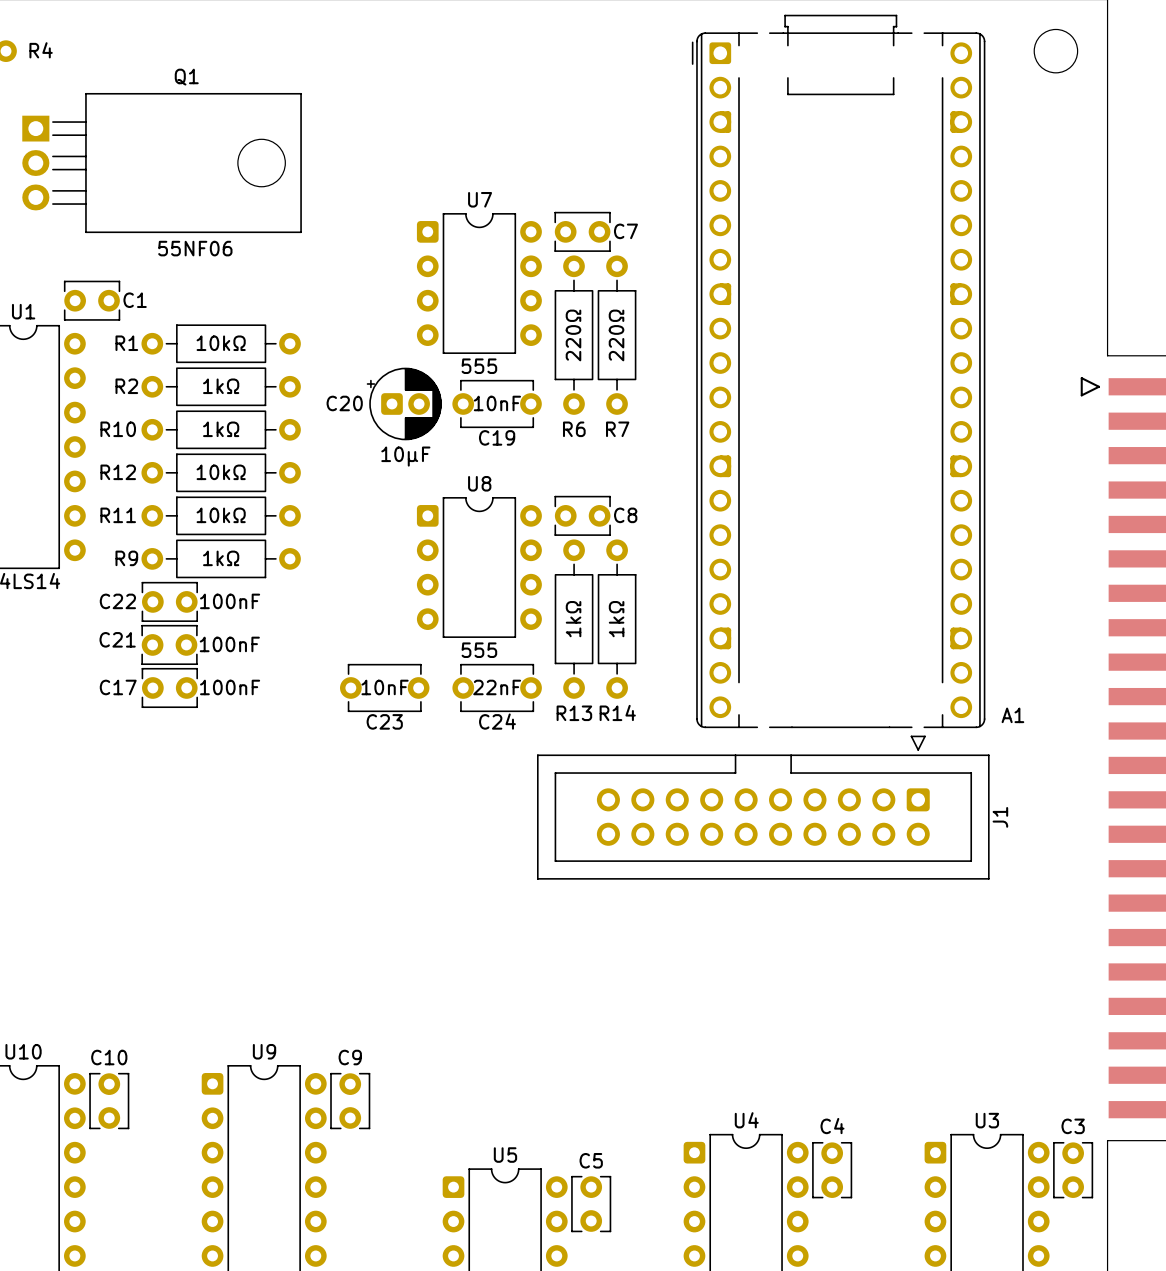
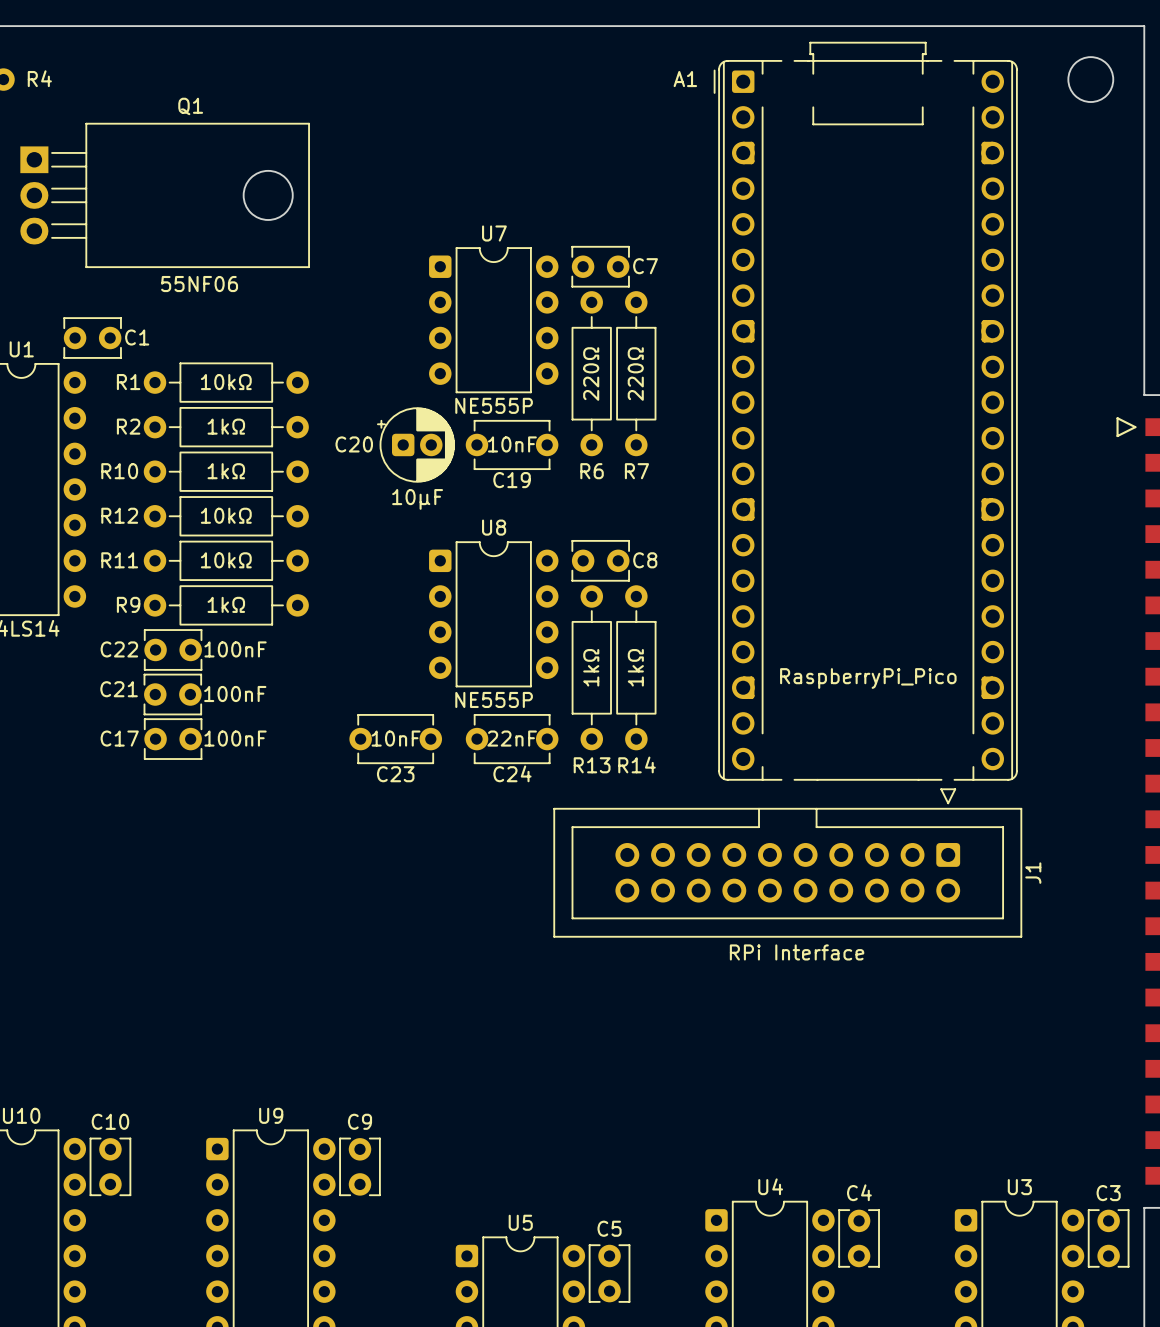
U7 value: 555 (479, 366) -> NE555P (494, 405)
A1 value: none -> RaspberryPi_Pico (868, 678)
U8 value: 555 (479, 650) -> NE555P (494, 699)
A1 name position: A1 (1012, 715) -> A1 (685, 79)
J1 value: none -> RPi Interface (797, 952)

